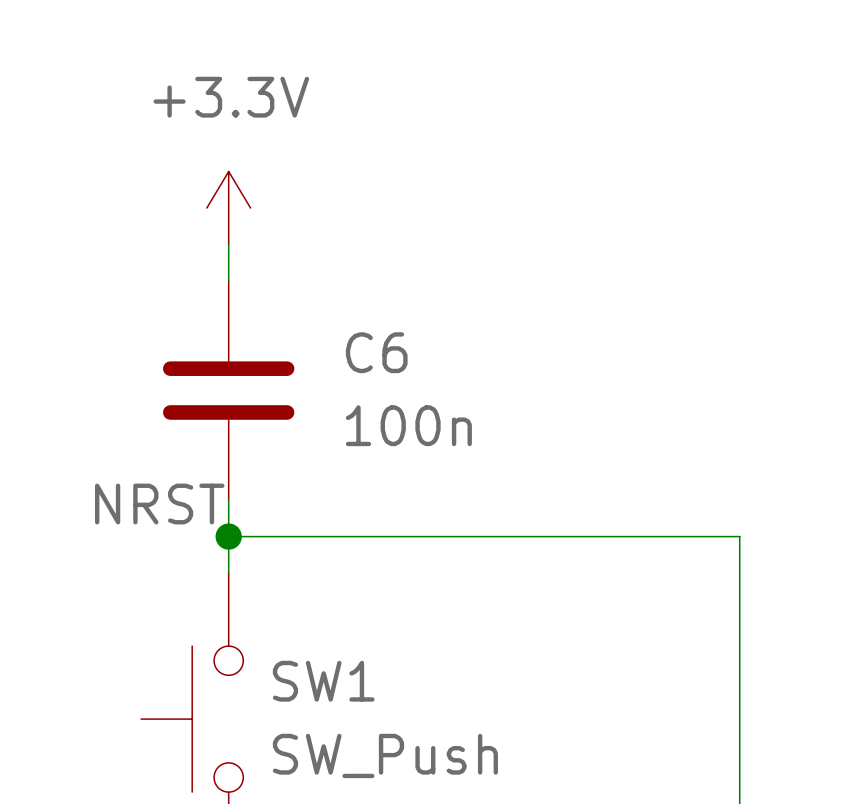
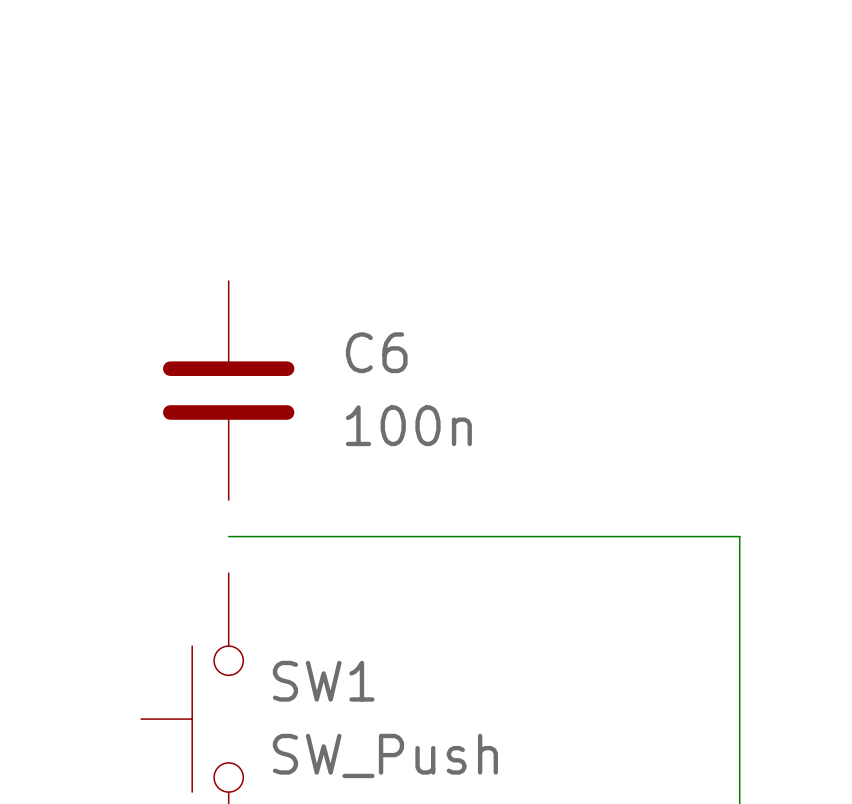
power symbol: +3.3V (228, 208) -> none
wire: (228, 244) (228, 281) -> none
wire: (228, 500) (228, 573) -> none
label: NRST (159, 504) -> none
junction: (228, 536) -> none

